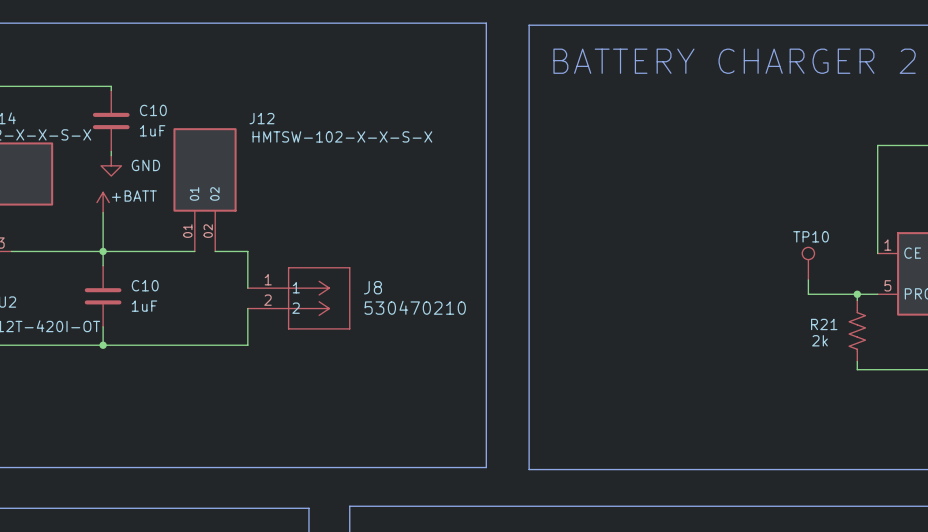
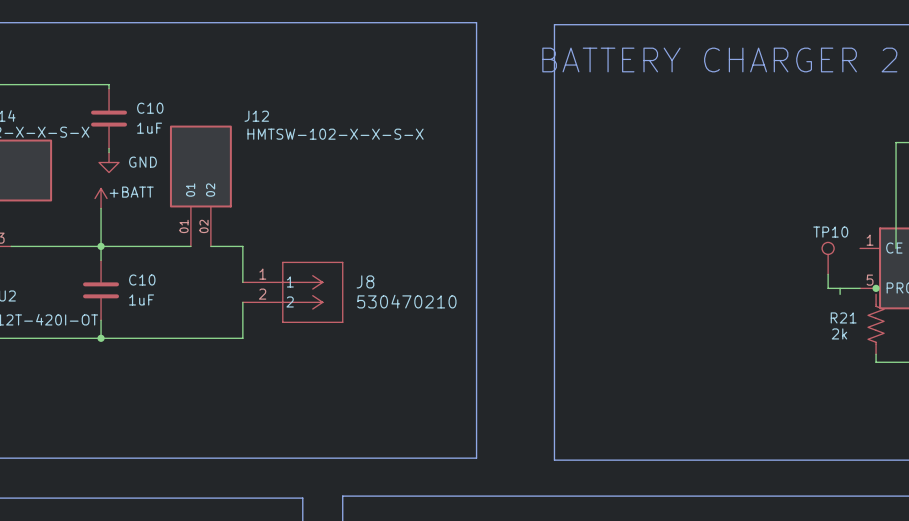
line: (565, 25) (529, 25) (529, 469) (565, 469) -> (554, 24) (554, 460)
wire: (914, 145) (877, 145) (877, 253) -> (896, 142) (896, 248)
TP10 position: (808, 263) -> (828, 258)
wire: (808, 280) (808, 294) (845, 294) -> (828, 274) (828, 288)
junction position: (857, 294) -> (876, 288)
R21 position: (857, 330) -> (876, 324)
wire: (857, 361) (857, 369) (893, 369) -> (876, 354) (876, 362)

